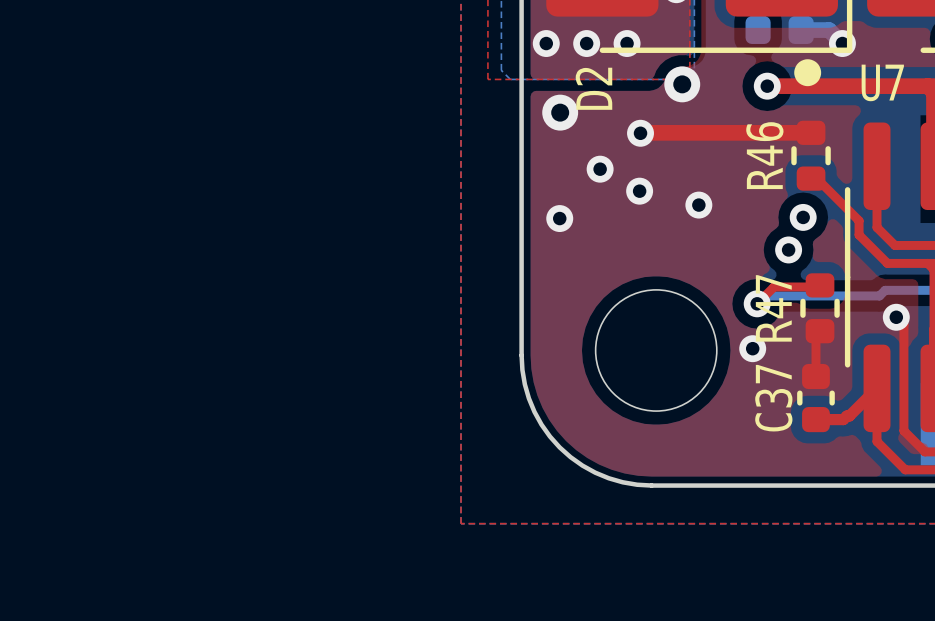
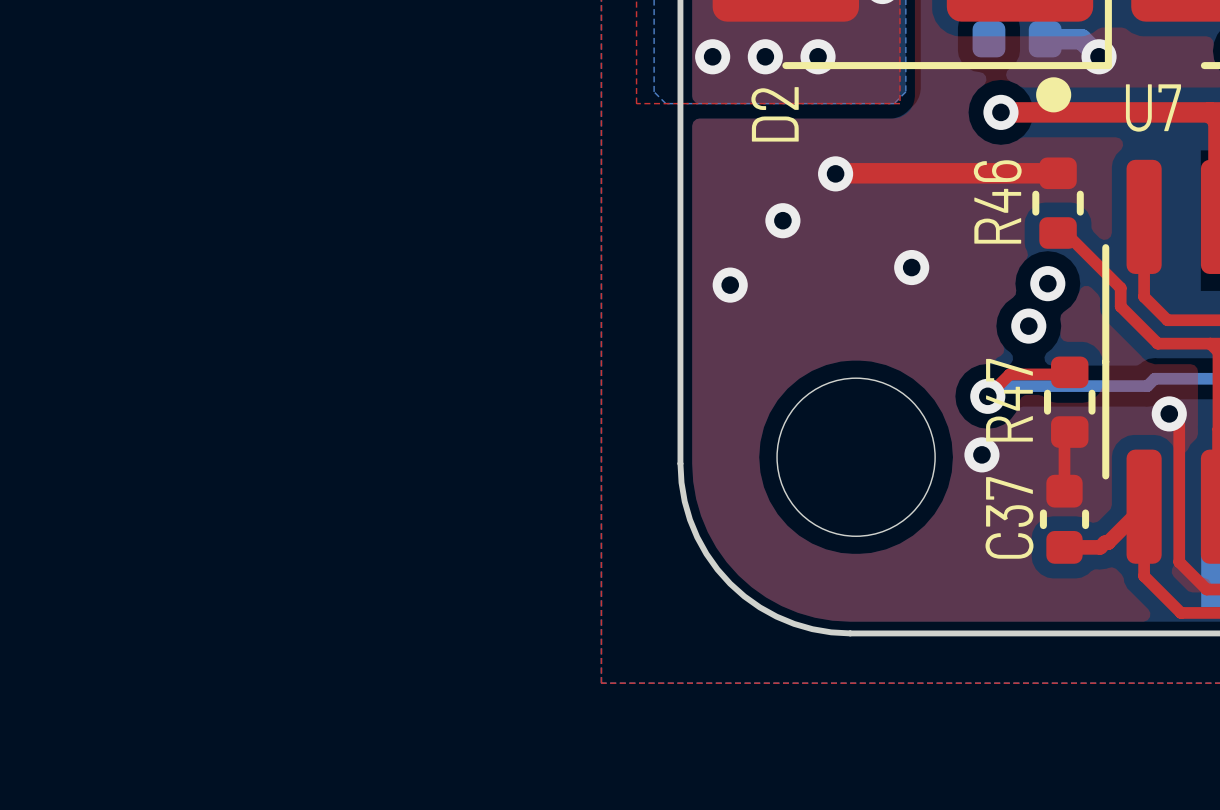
via: (682, 84) -> none
via: (560, 112) -> none
via: (639, 191) -> none

